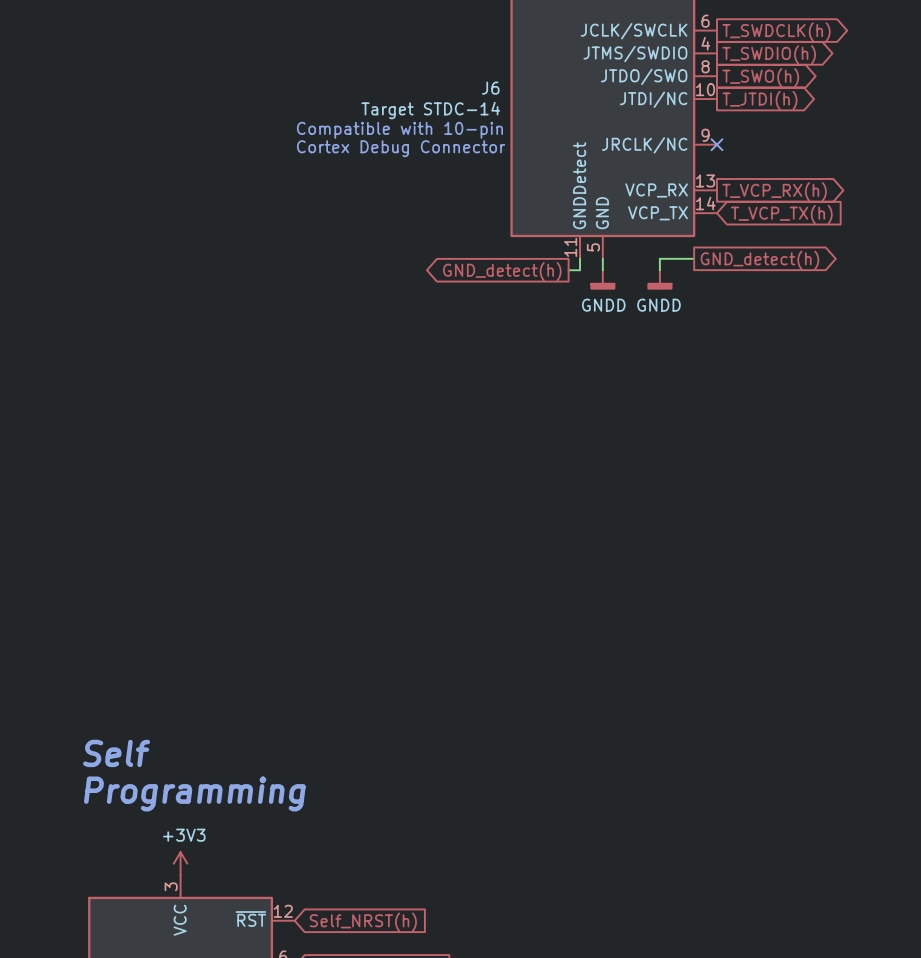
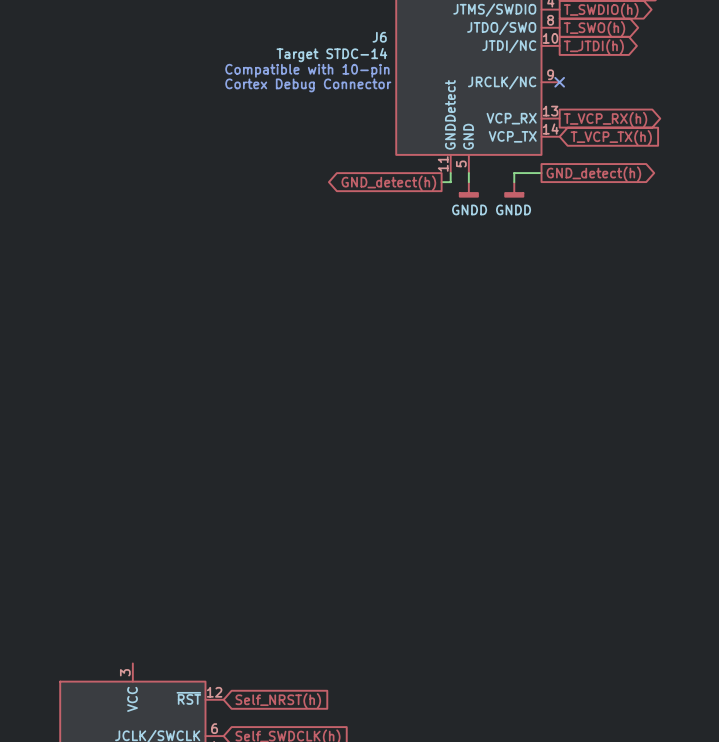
text: Self (116, 753) -> none
text: Programming (194, 793) -> none
power symbol: +3V3 (180, 863) -> none

